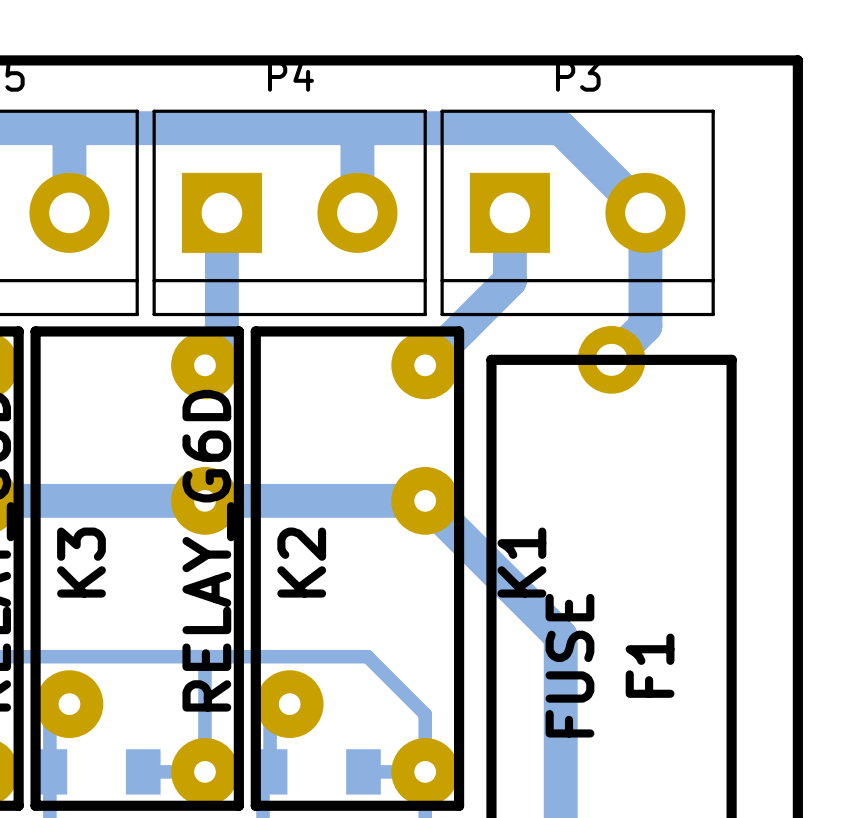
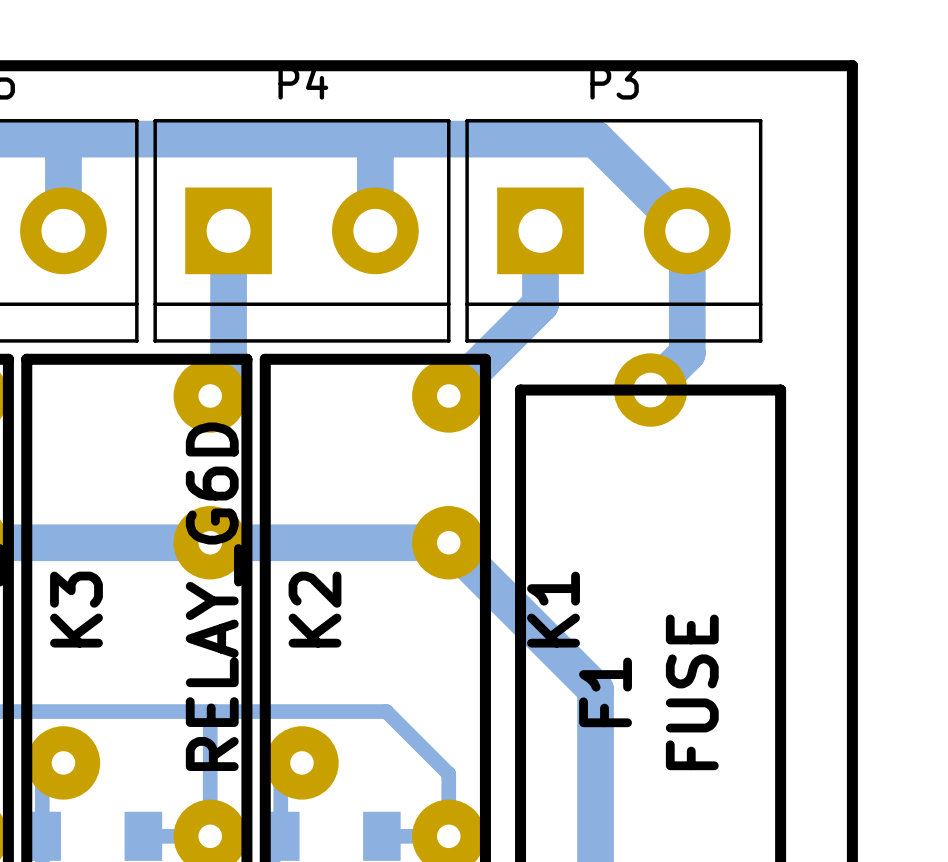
F1 value position: FUSE (569, 665) -> FUSE (692, 692)
F1 name position: F1 (650, 665) -> F1 (605, 692)

